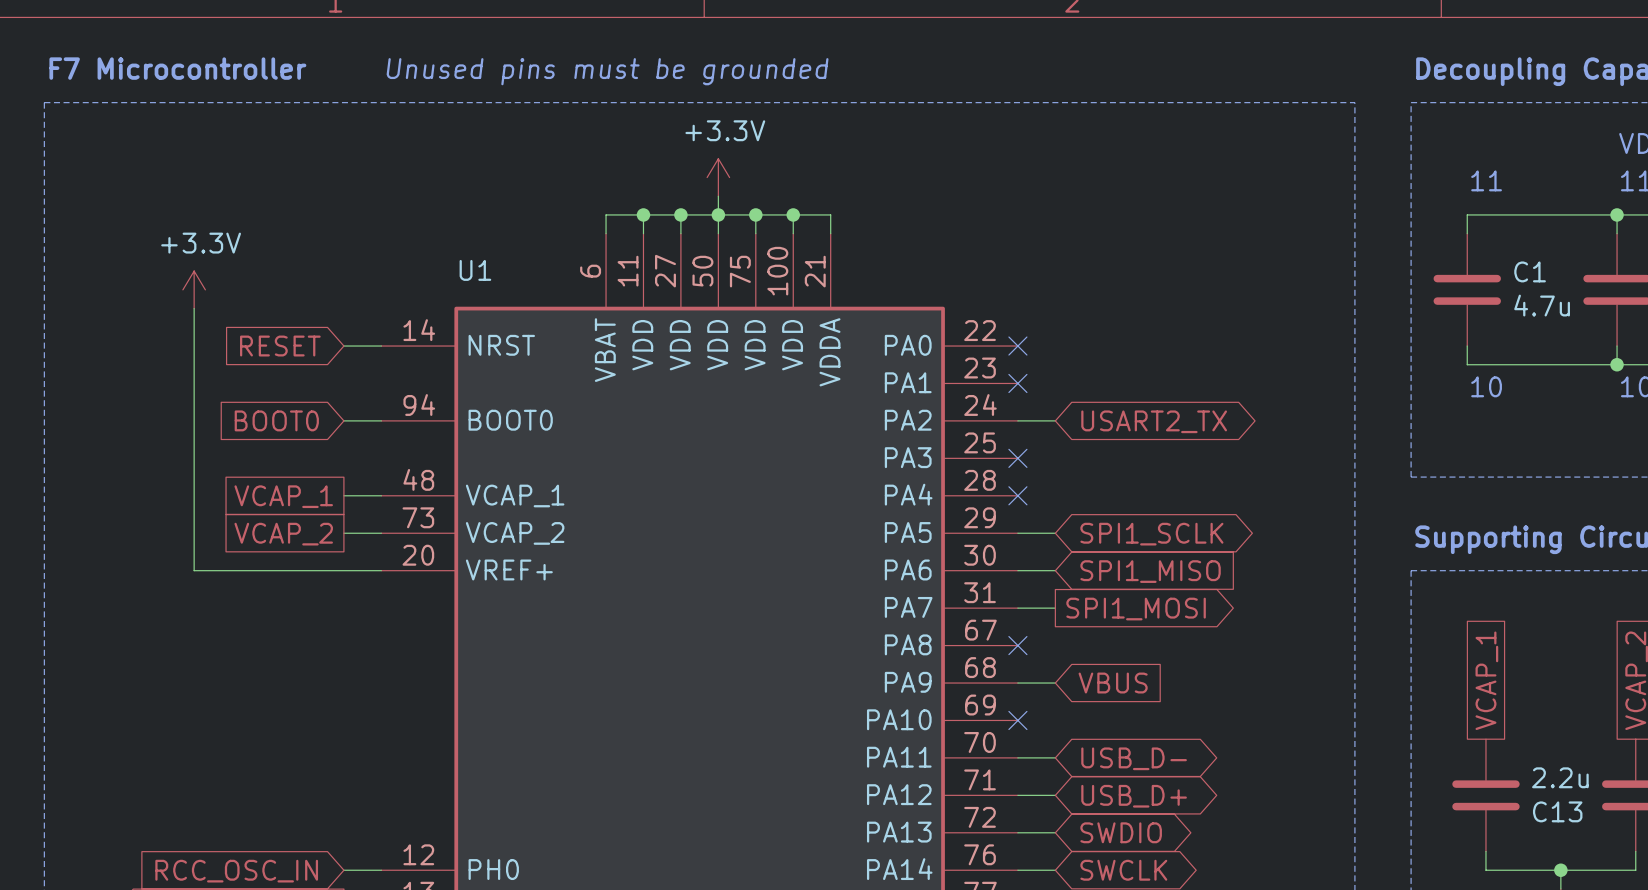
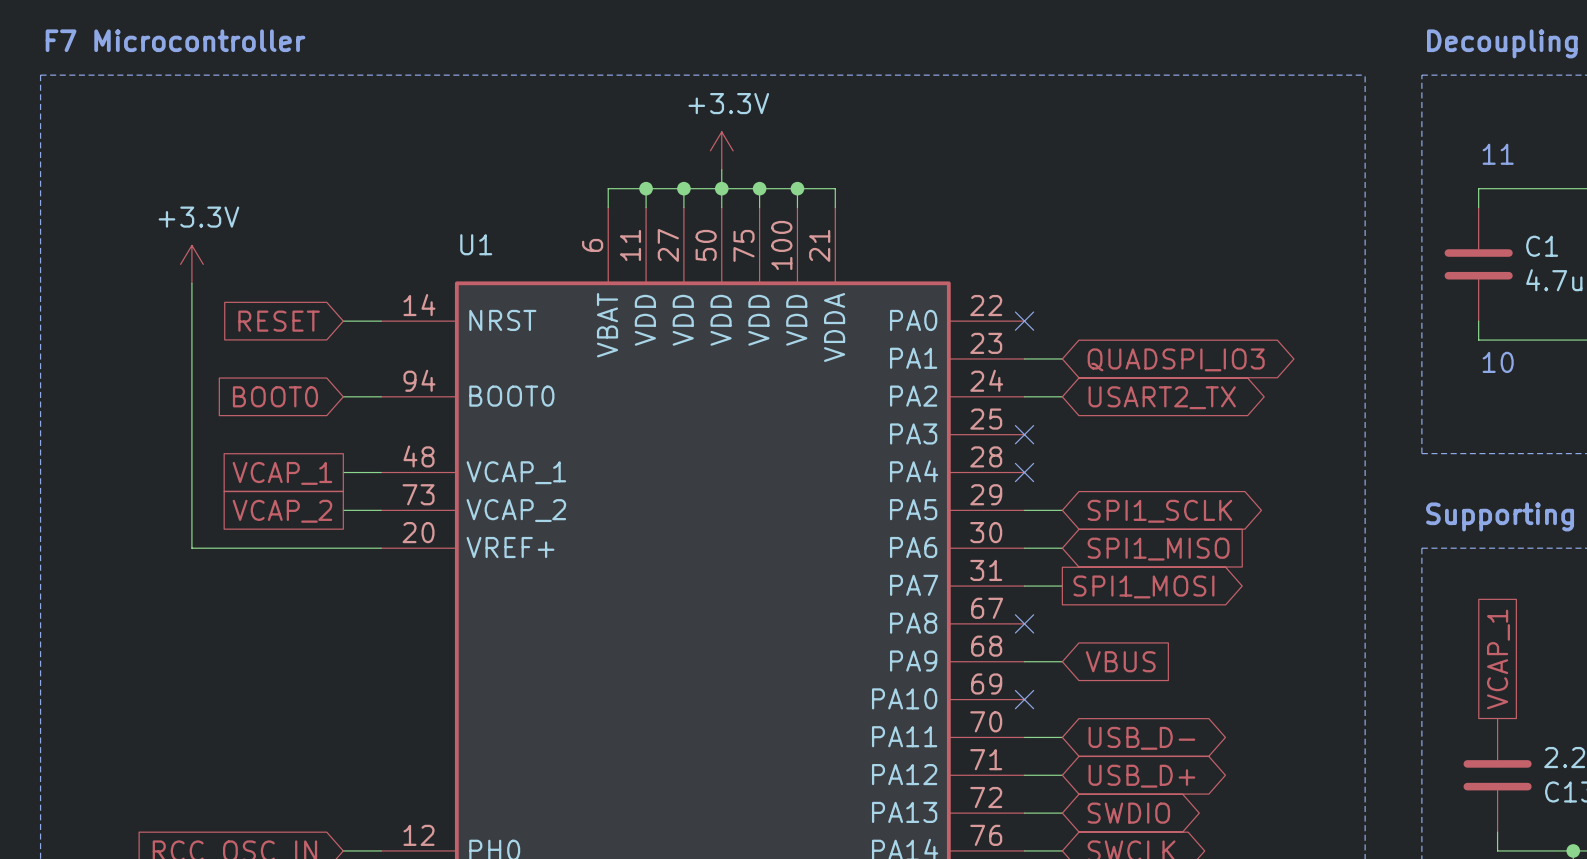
text: Unused pins must be grounded (607, 71) -> none
wire: none -> (1024, 358) (1062, 358)
no-connect mark: (1017, 383) -> none
global label: none -> QUADSPI_IO3 (1176, 359)

